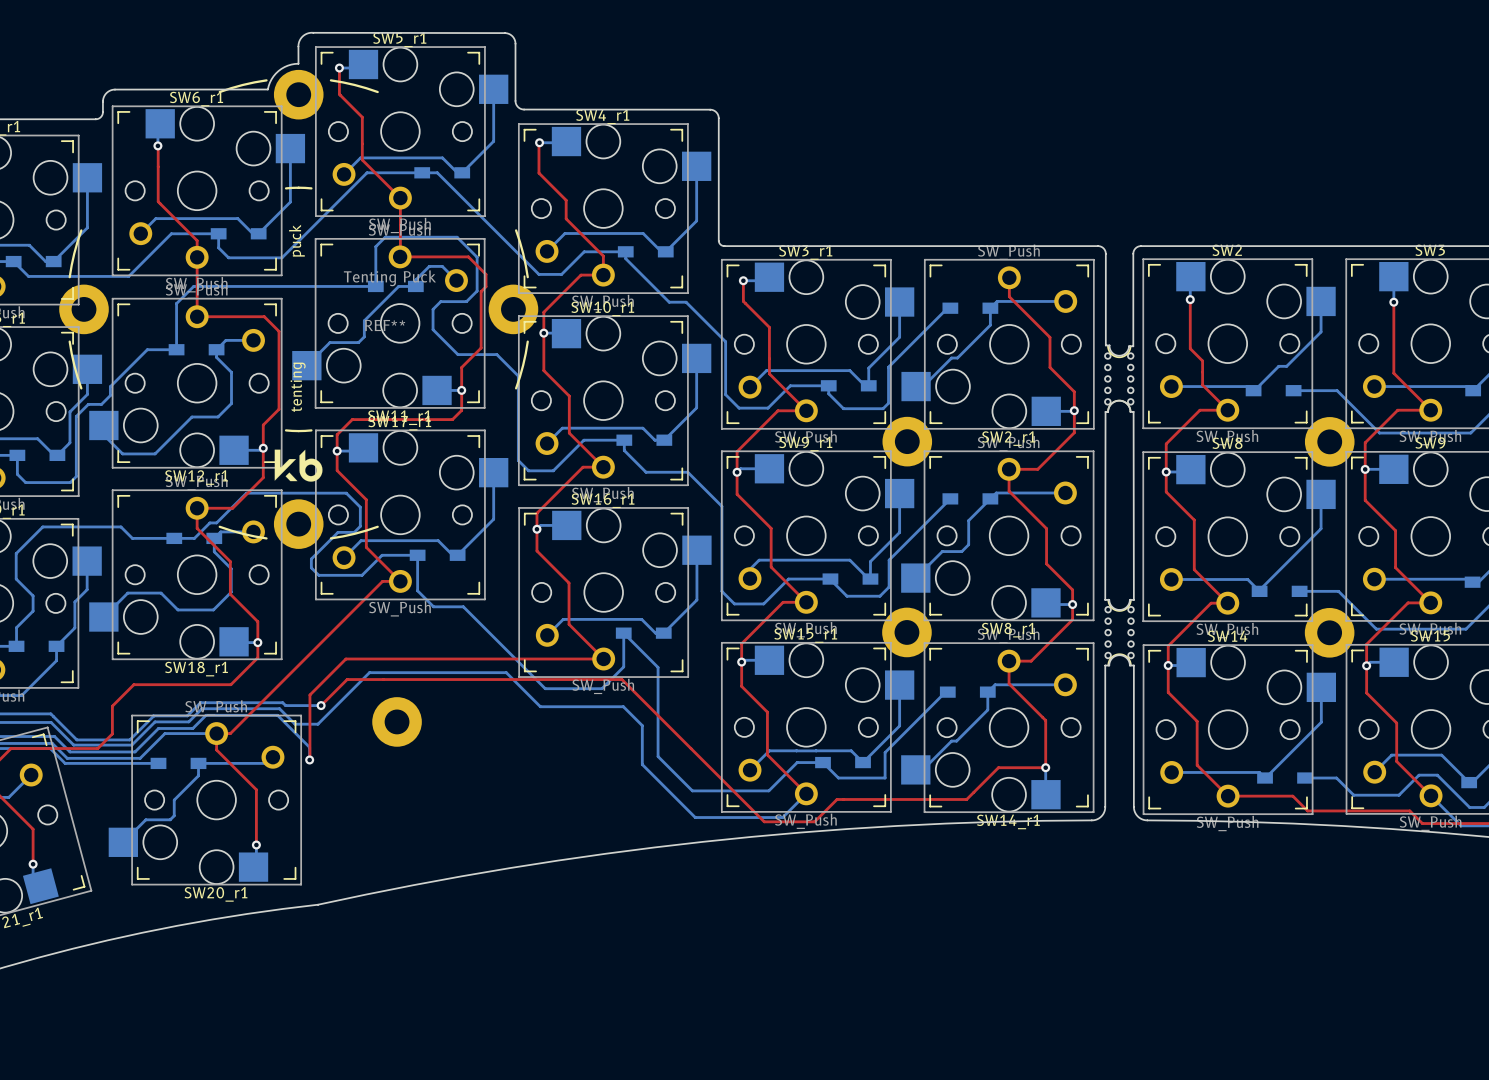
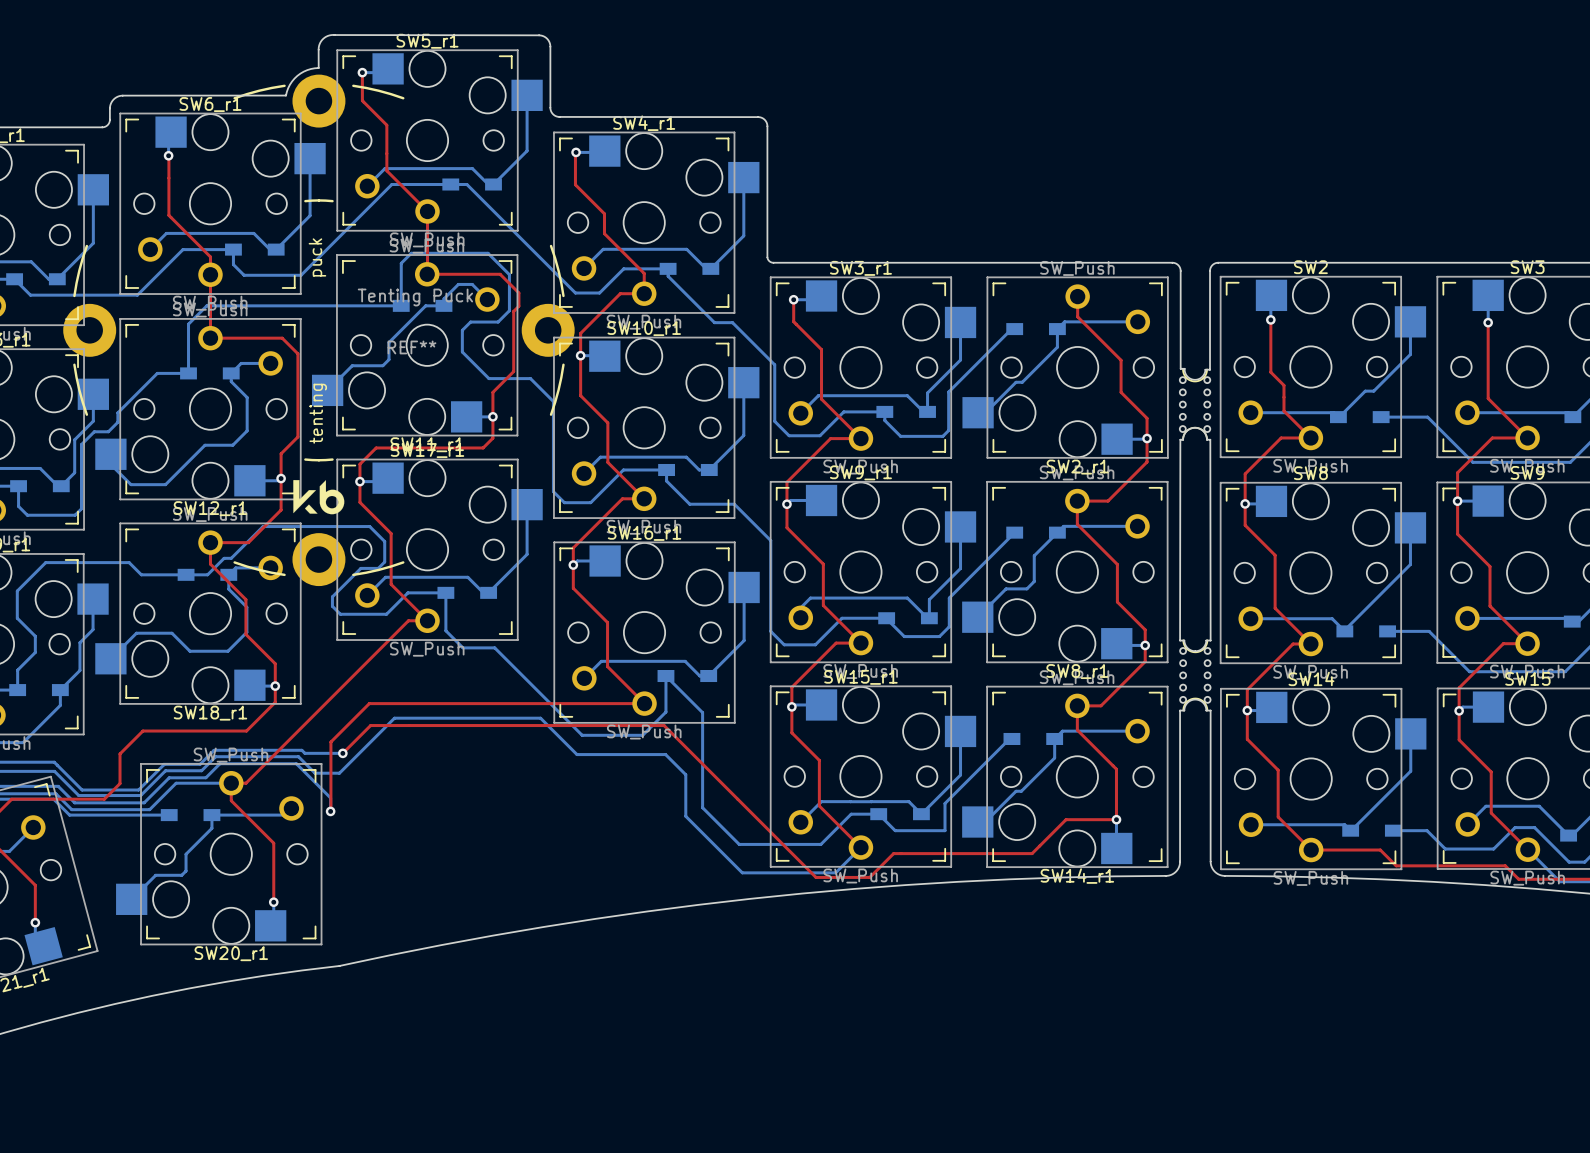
part: (907, 441) -> none
part: (1329, 441) -> none
part: (906, 632) -> none
part: (1329, 632) -> none
part: (397, 721) -> none

